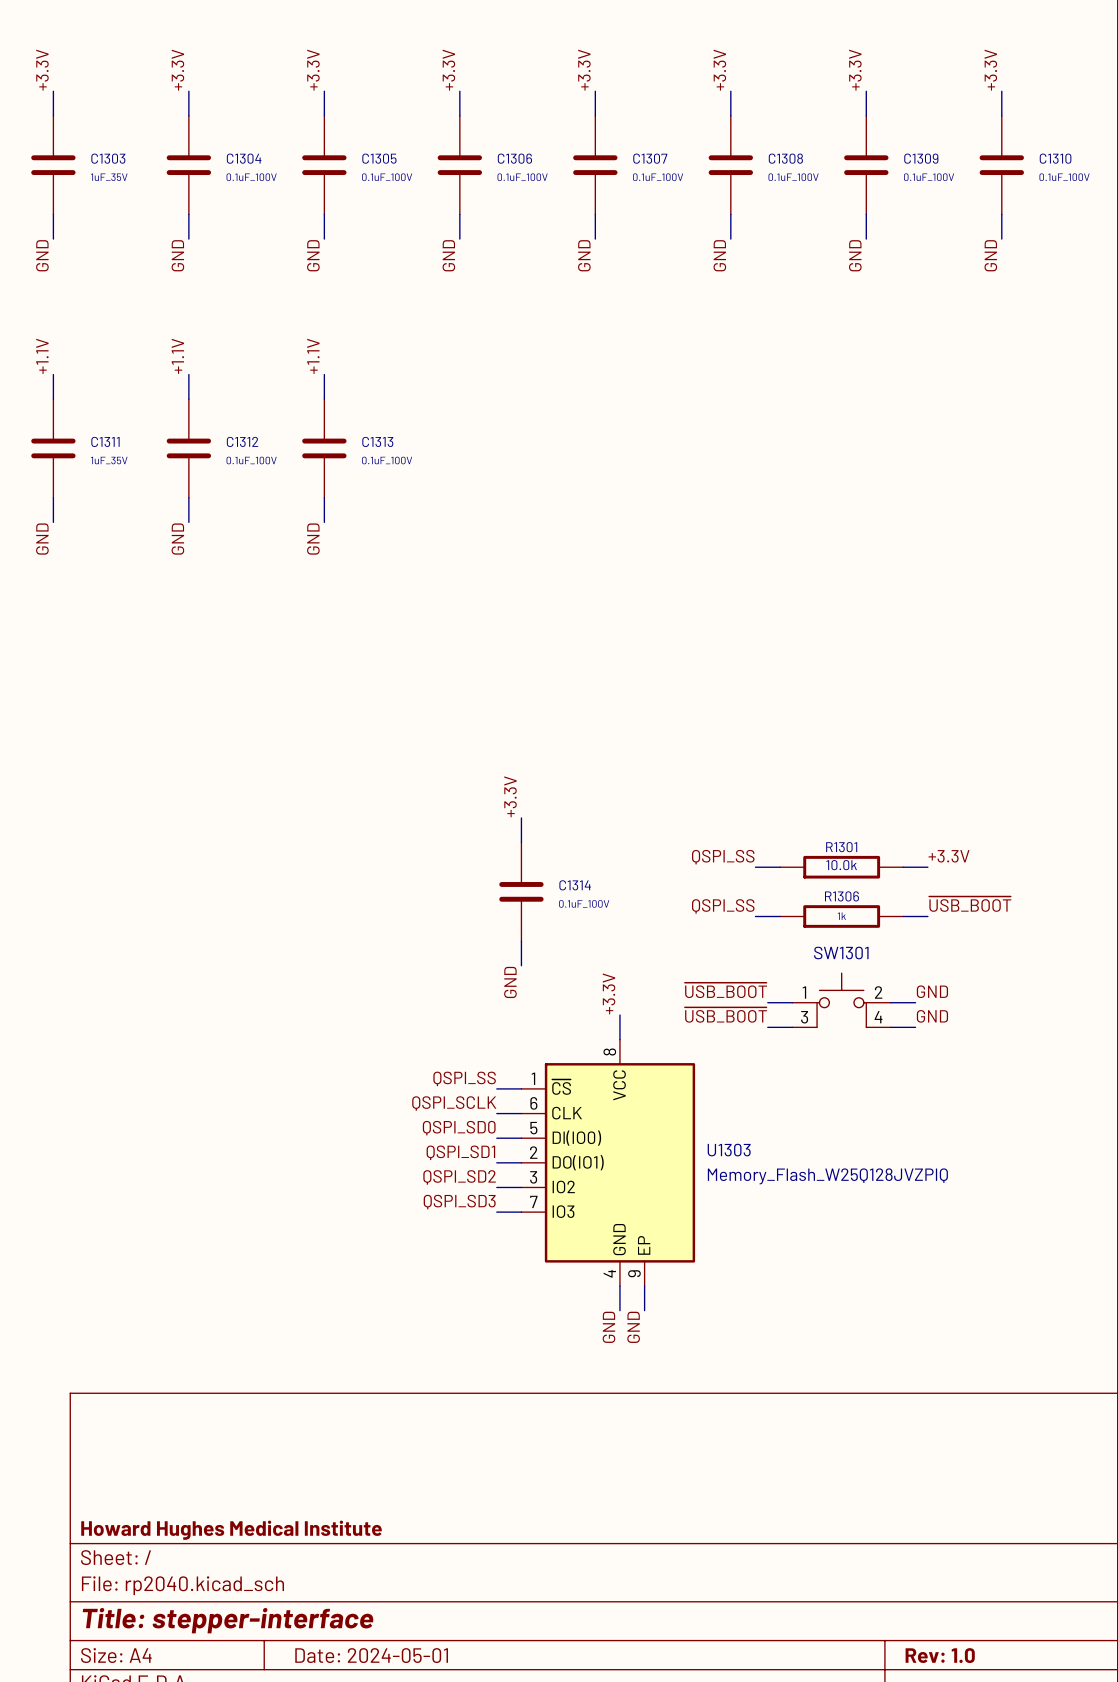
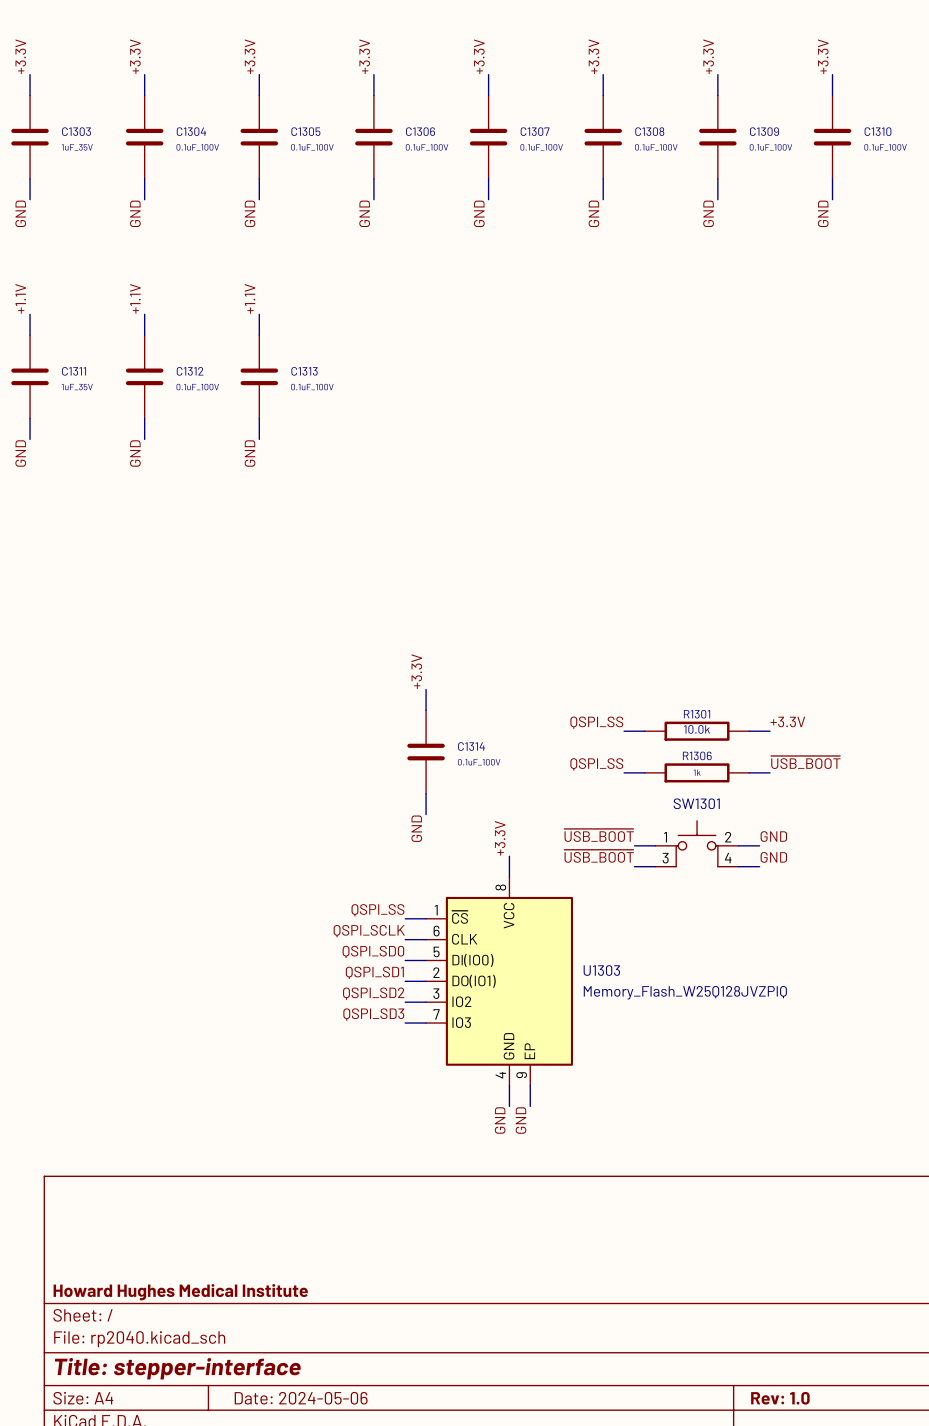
title block: Date: 2024-05-01 (371, 1655) -> Date: 2024-05-06 (301, 1398)

